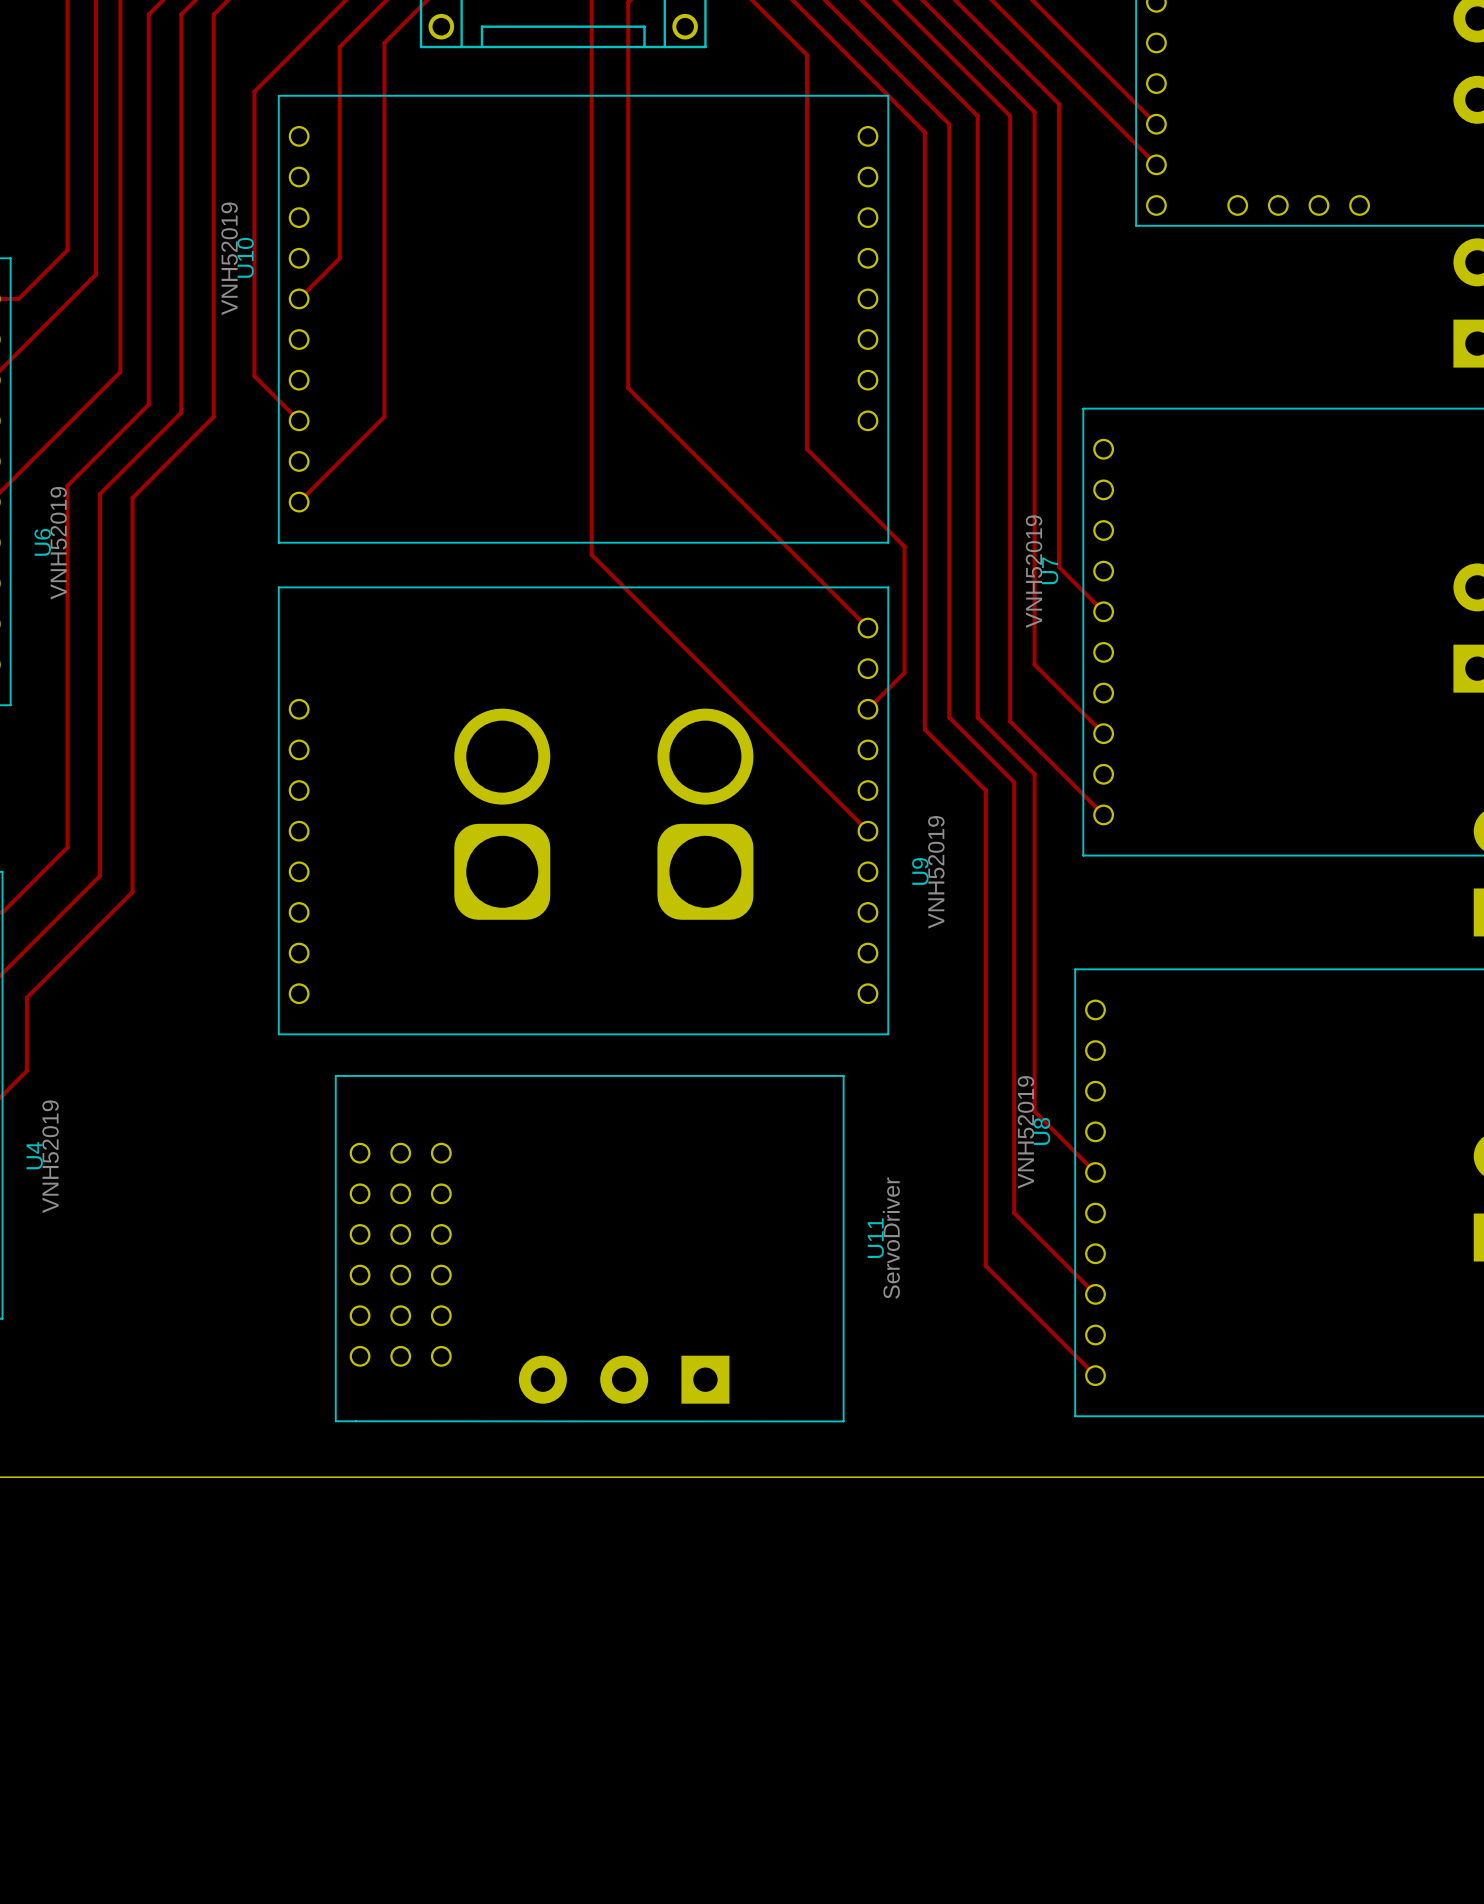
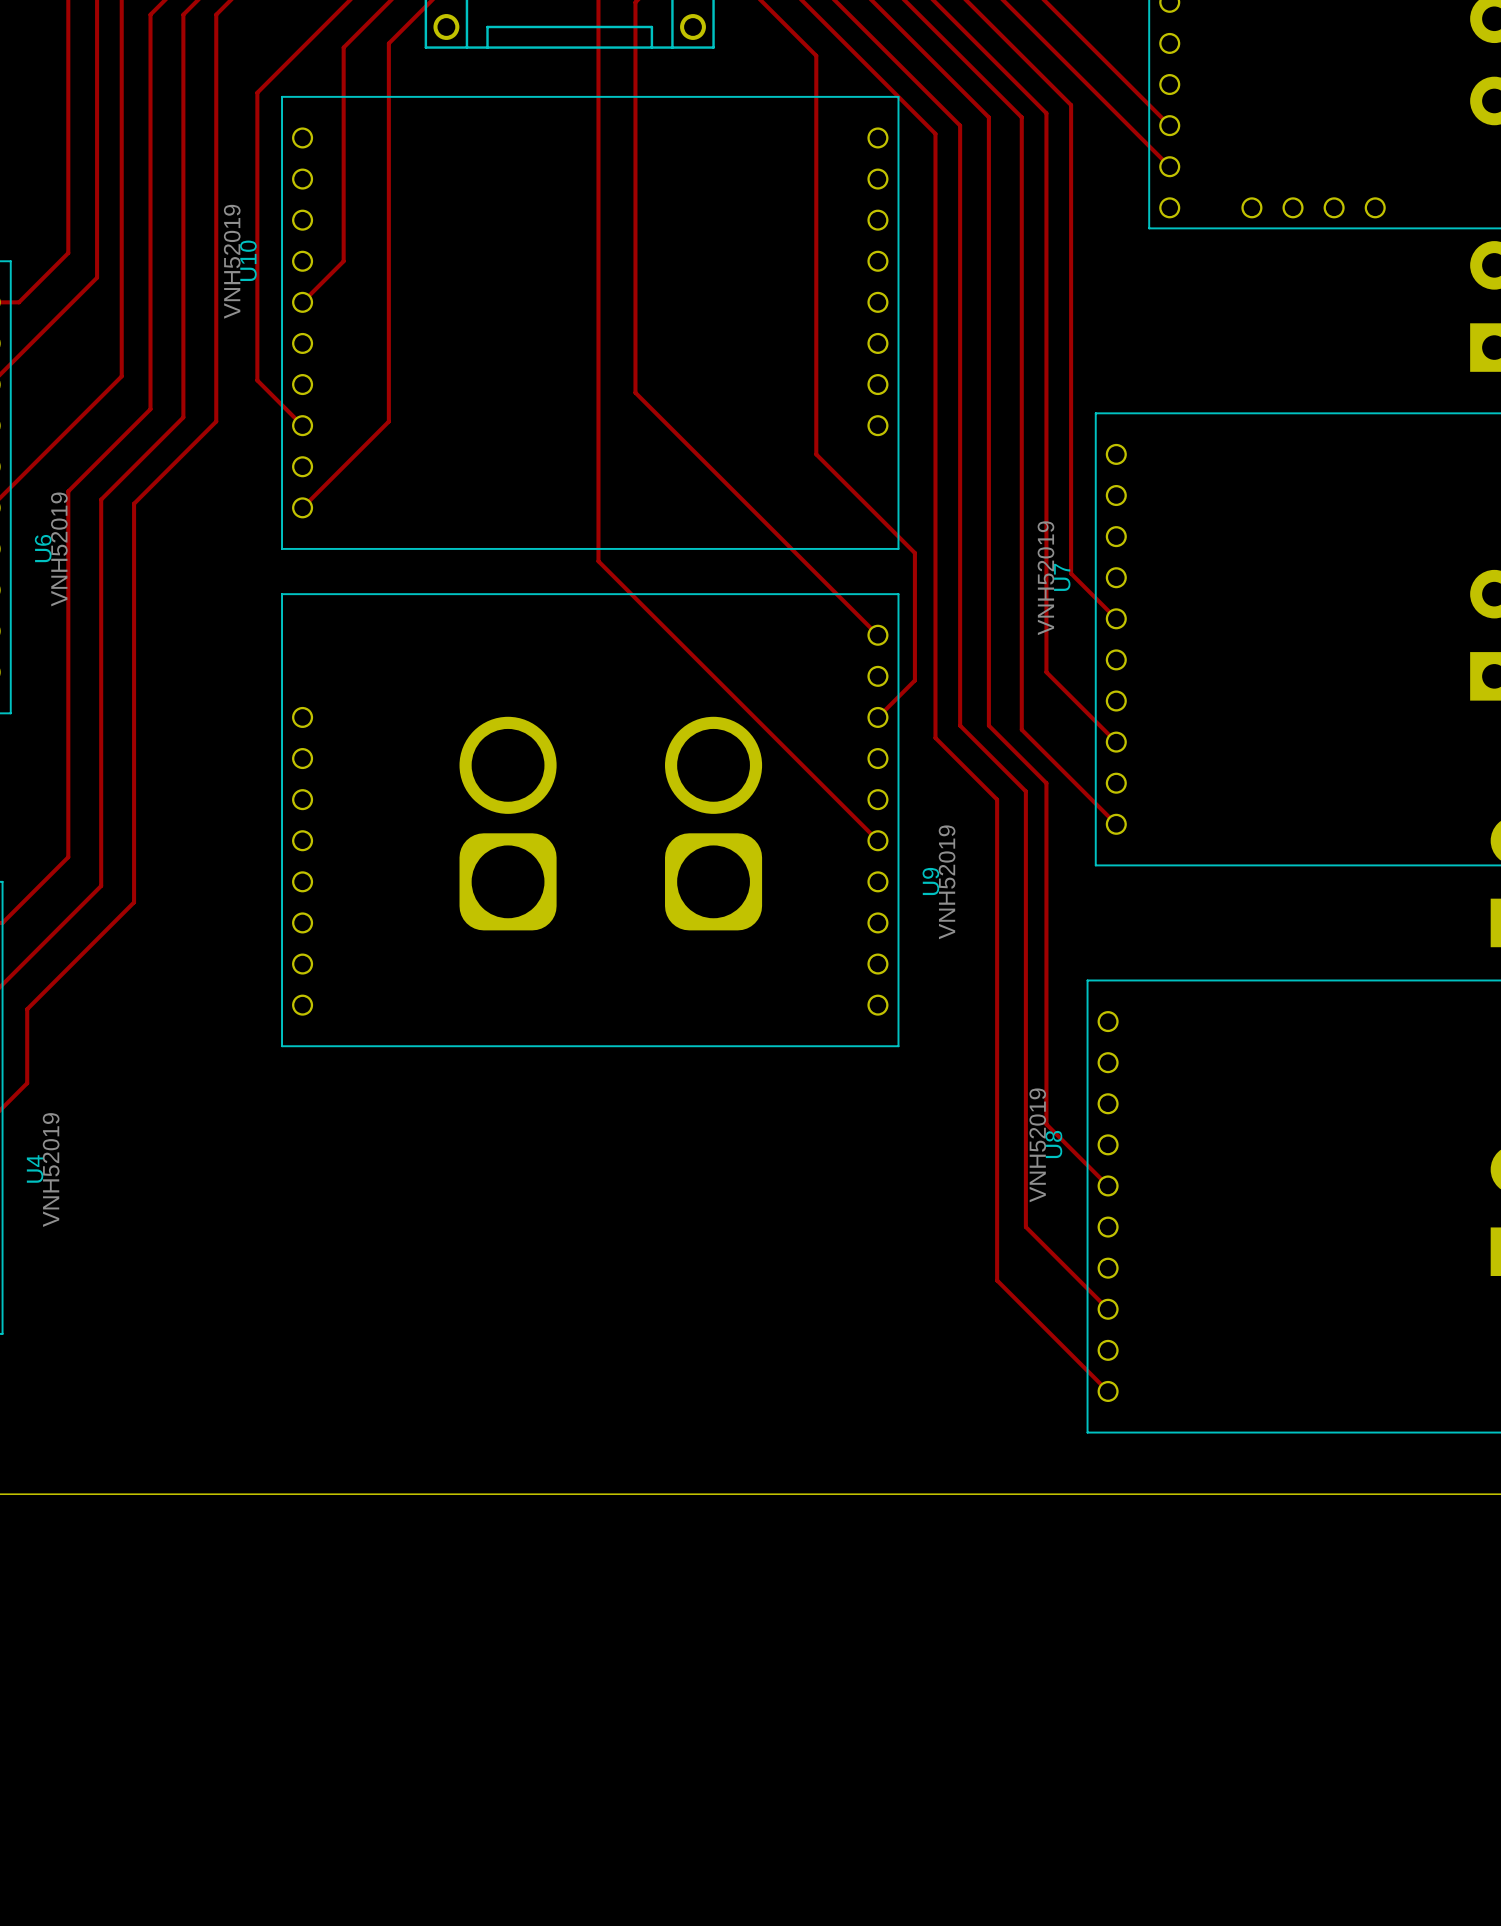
U11: ServoDriver (589, 1248) -> none
part: (624, 1379) -> none

